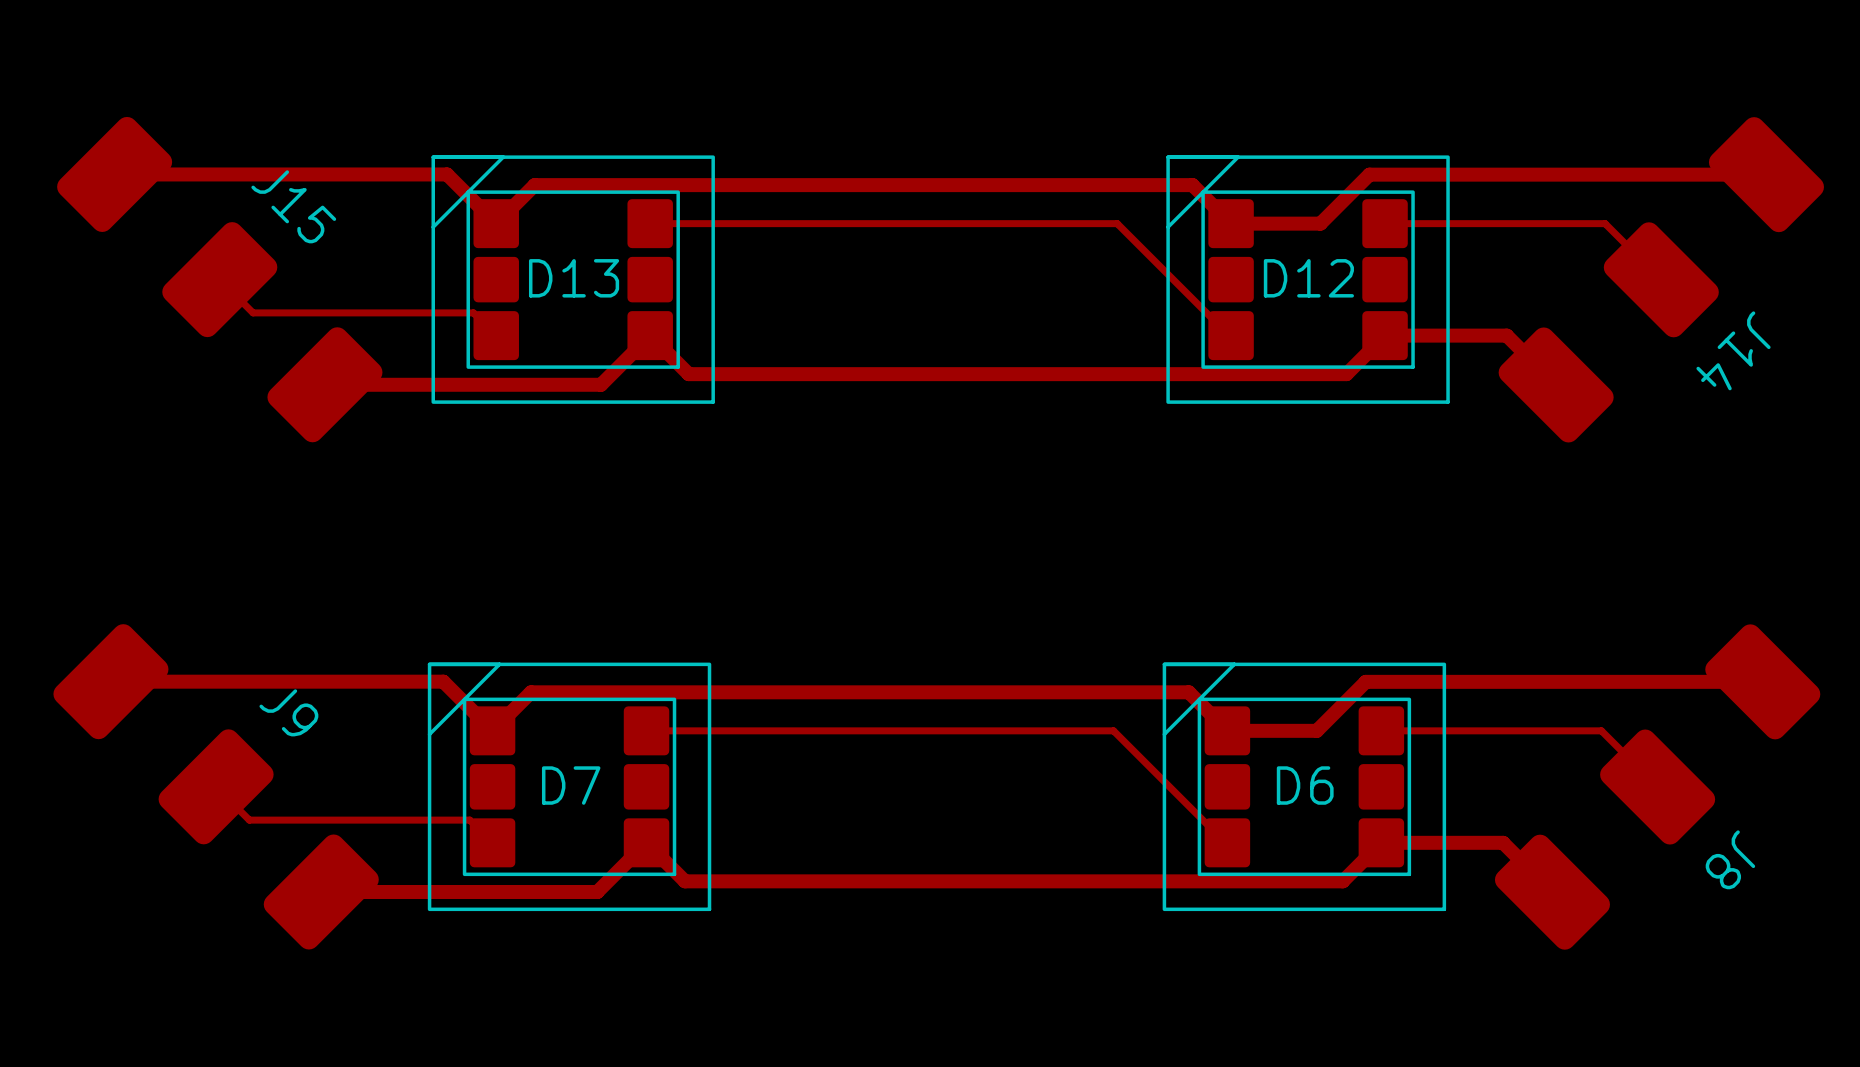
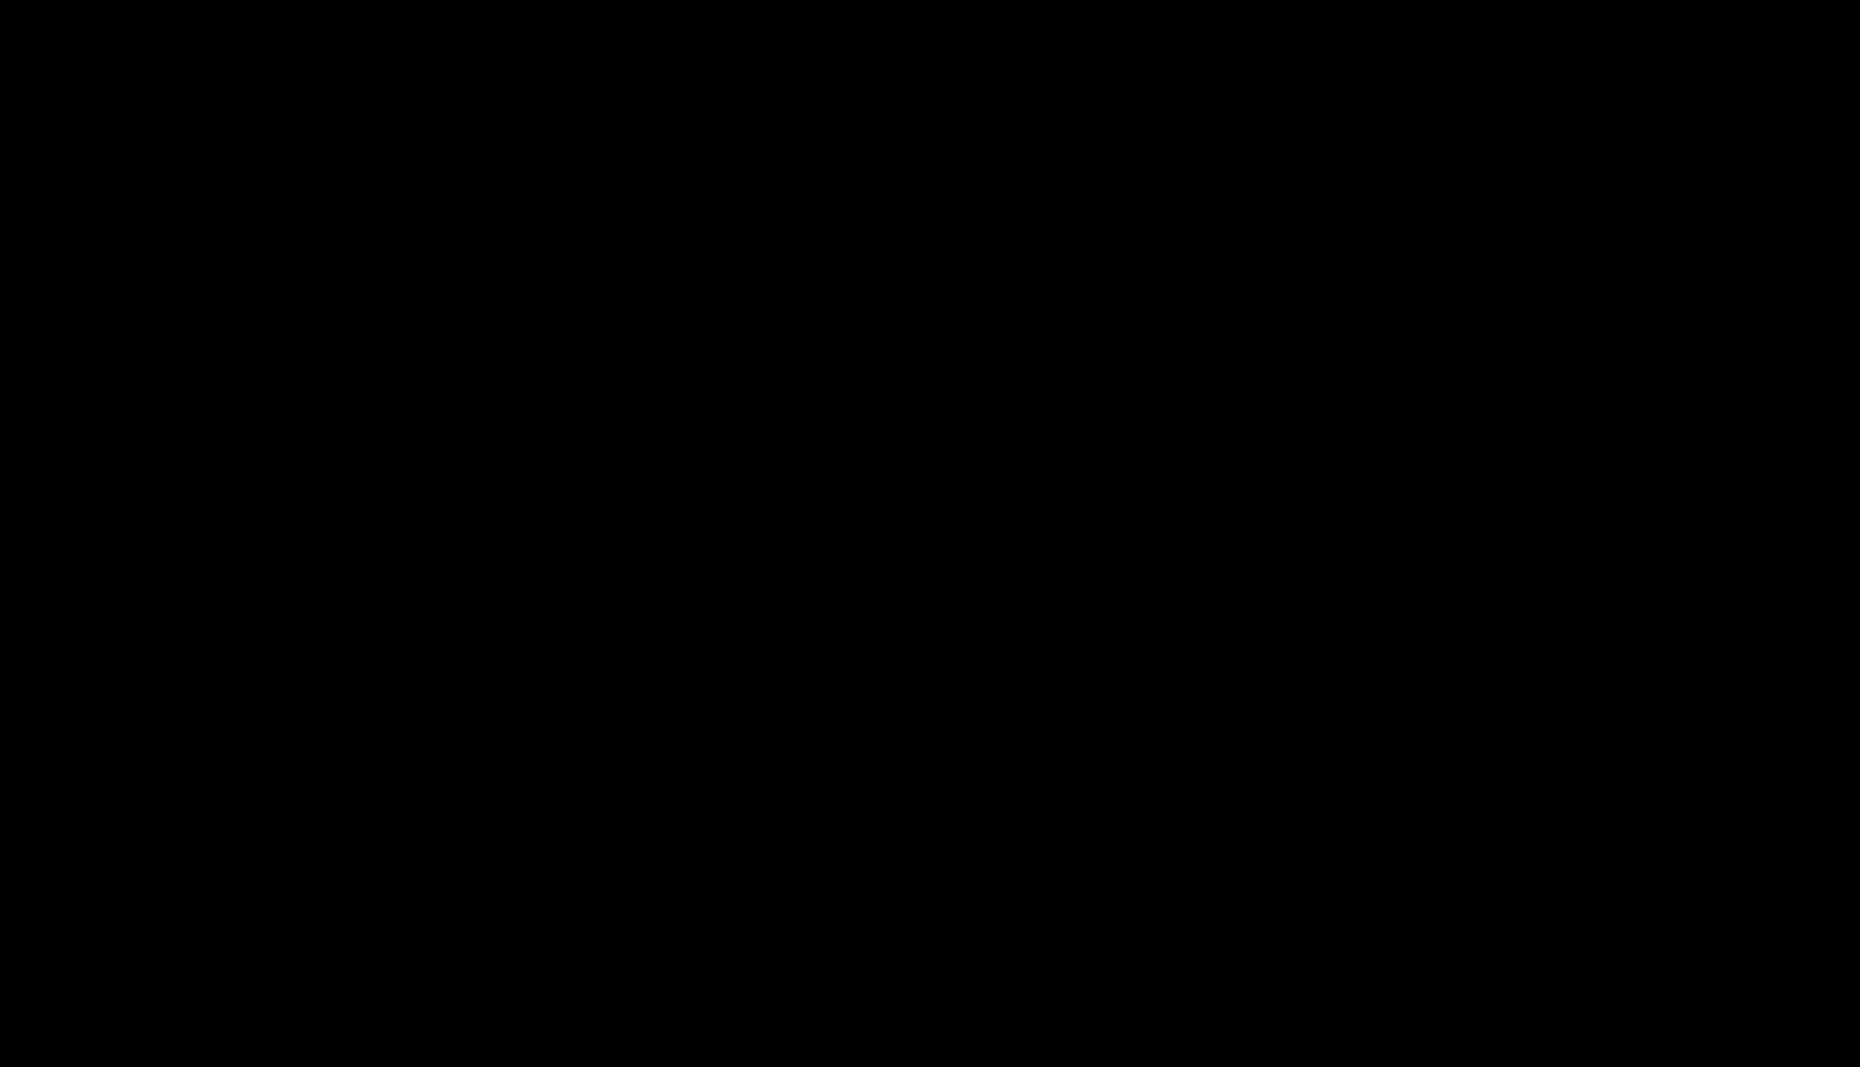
track: (114, 174) (447, 174) (496, 223) (534, 185) (1192, 185) (1231, 223) (1320, 223) (1369, 174) (1766, 174) -> none
track: (650, 223) (1117, 223) (1231, 335) -> none
track: (1385, 223) (1605, 223) (1661, 279) -> none
track: (219, 279) (253, 312) (473, 312) (496, 335) -> none
J15: (219, 279) -> none
D13: (573, 279) -> none
D12: (1308, 279) -> none
J14: (1661, 279) -> none
track: (324, 384) (601, 384) (650, 335) (688, 374) (1346, 374) (1385, 335) (1506, 335) (1556, 384) -> none
track: (110, 681) (443, 681) (492, 730) (531, 692) (1188, 692) (1227, 730) (1316, 730) (1365, 681) (1762, 681) -> none
track: (646, 730) (1113, 730) (1227, 842) -> none
track: (1381, 730) (1601, 730) (1657, 787) -> none
track: (216, 786) (249, 820) (469, 820) (492, 842) -> none
J9: (216, 786) -> none
D7: (569, 786) -> none
D6: (1304, 786) -> none
J8: (1657, 787) -> none
track: (321, 891) (597, 891) (646, 842) (685, 881) (1342, 881) (1381, 842) (1503, 842) (1552, 892) -> none

